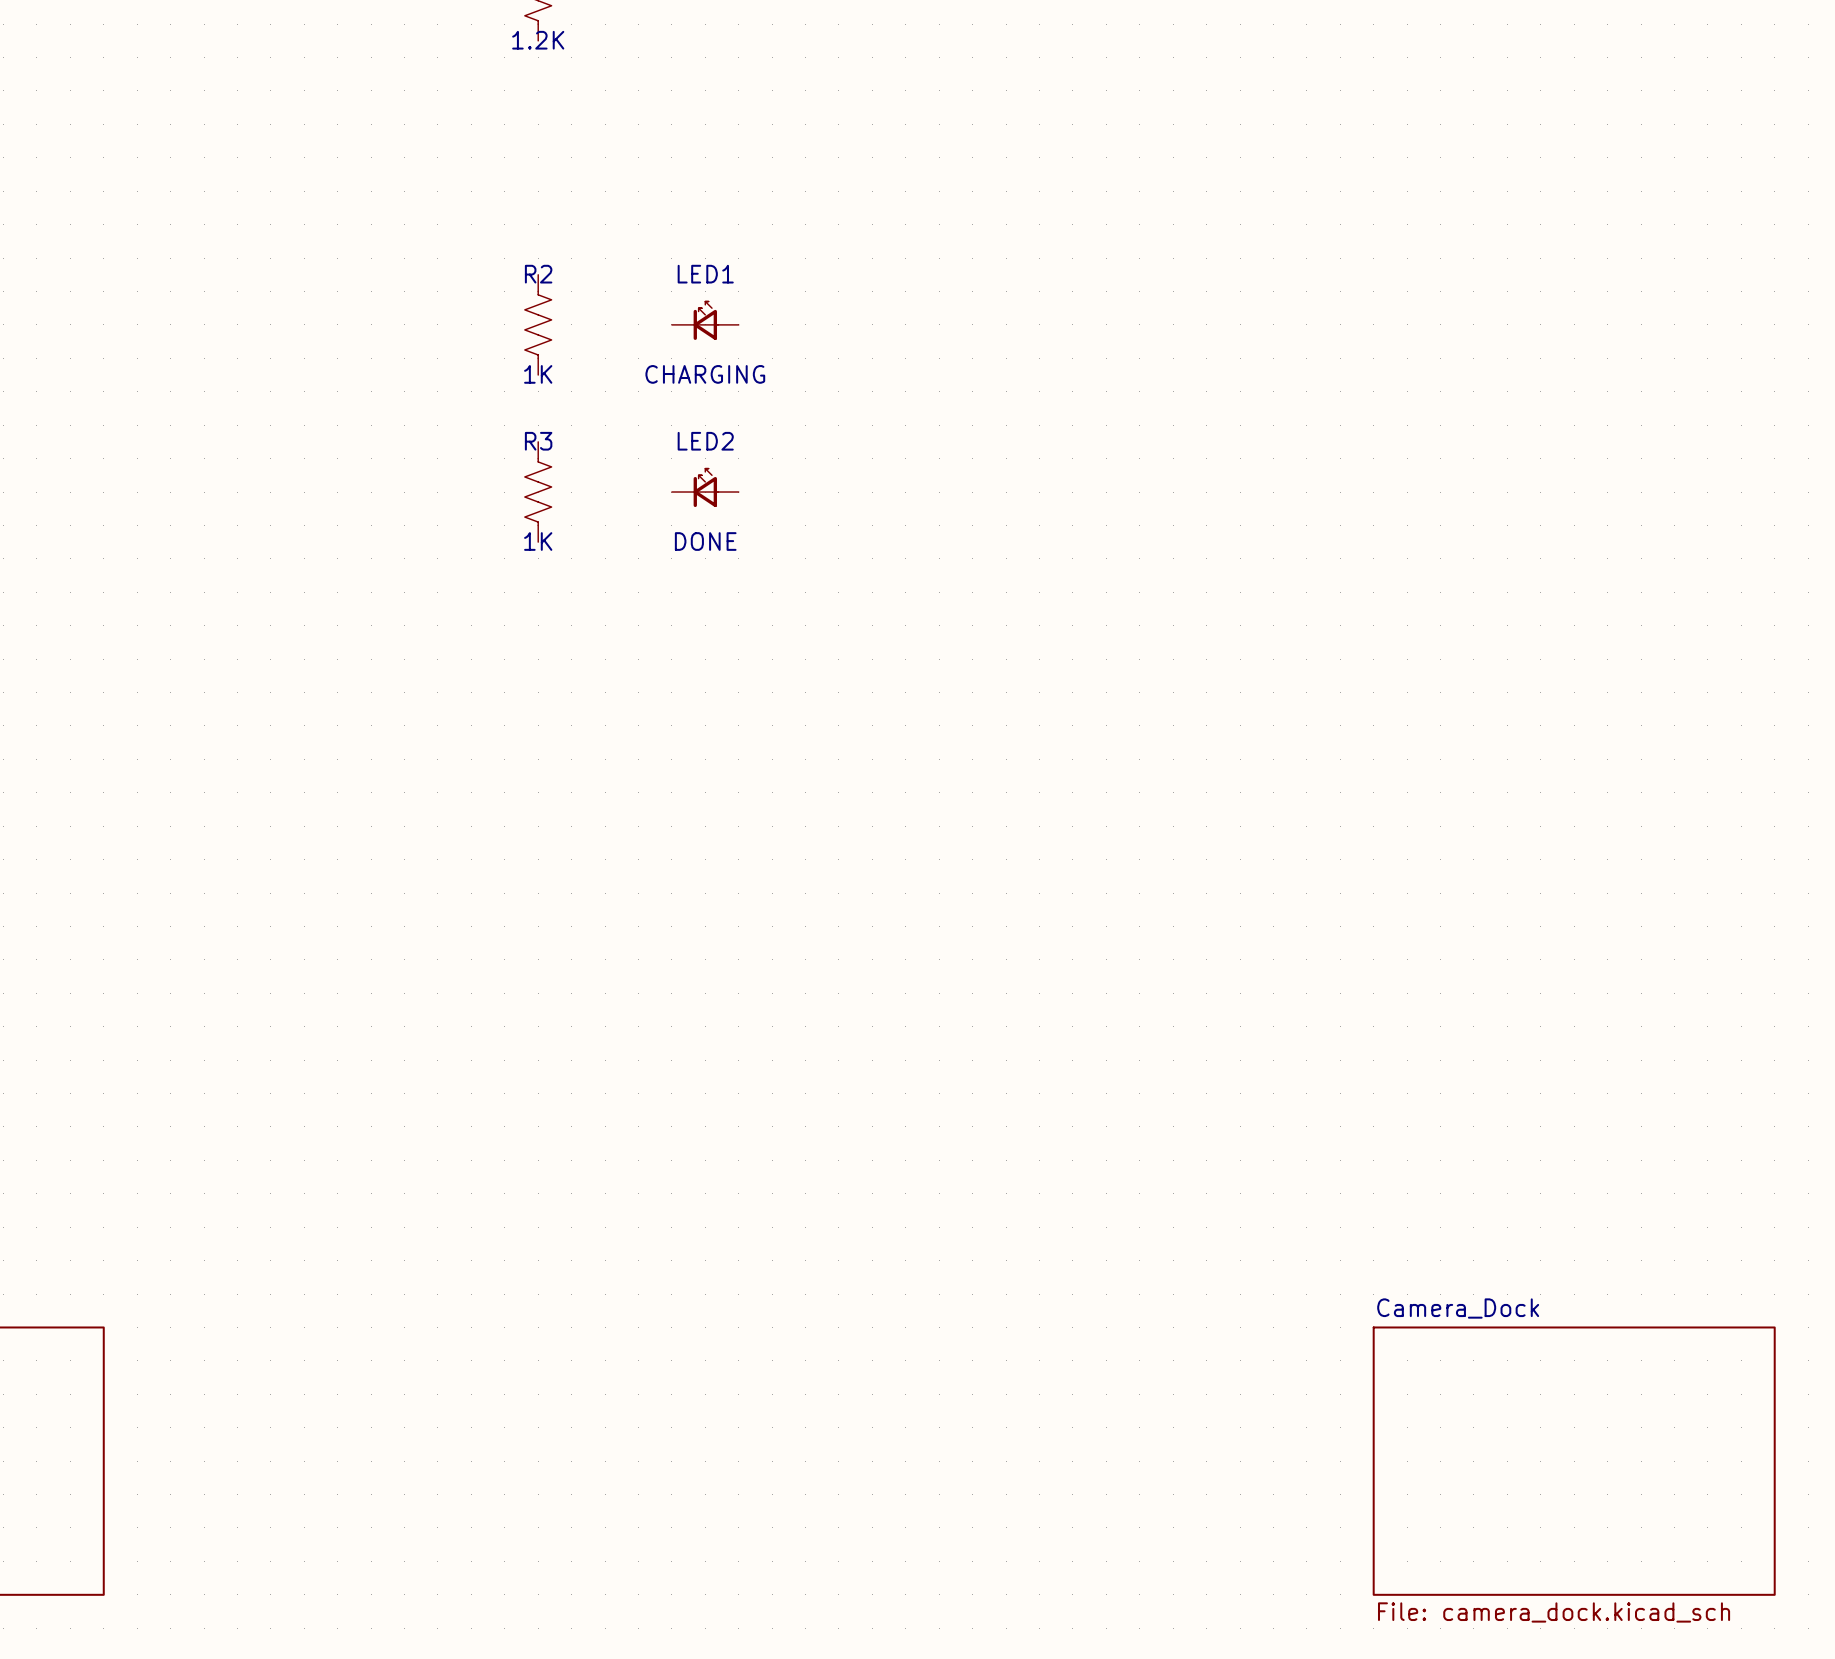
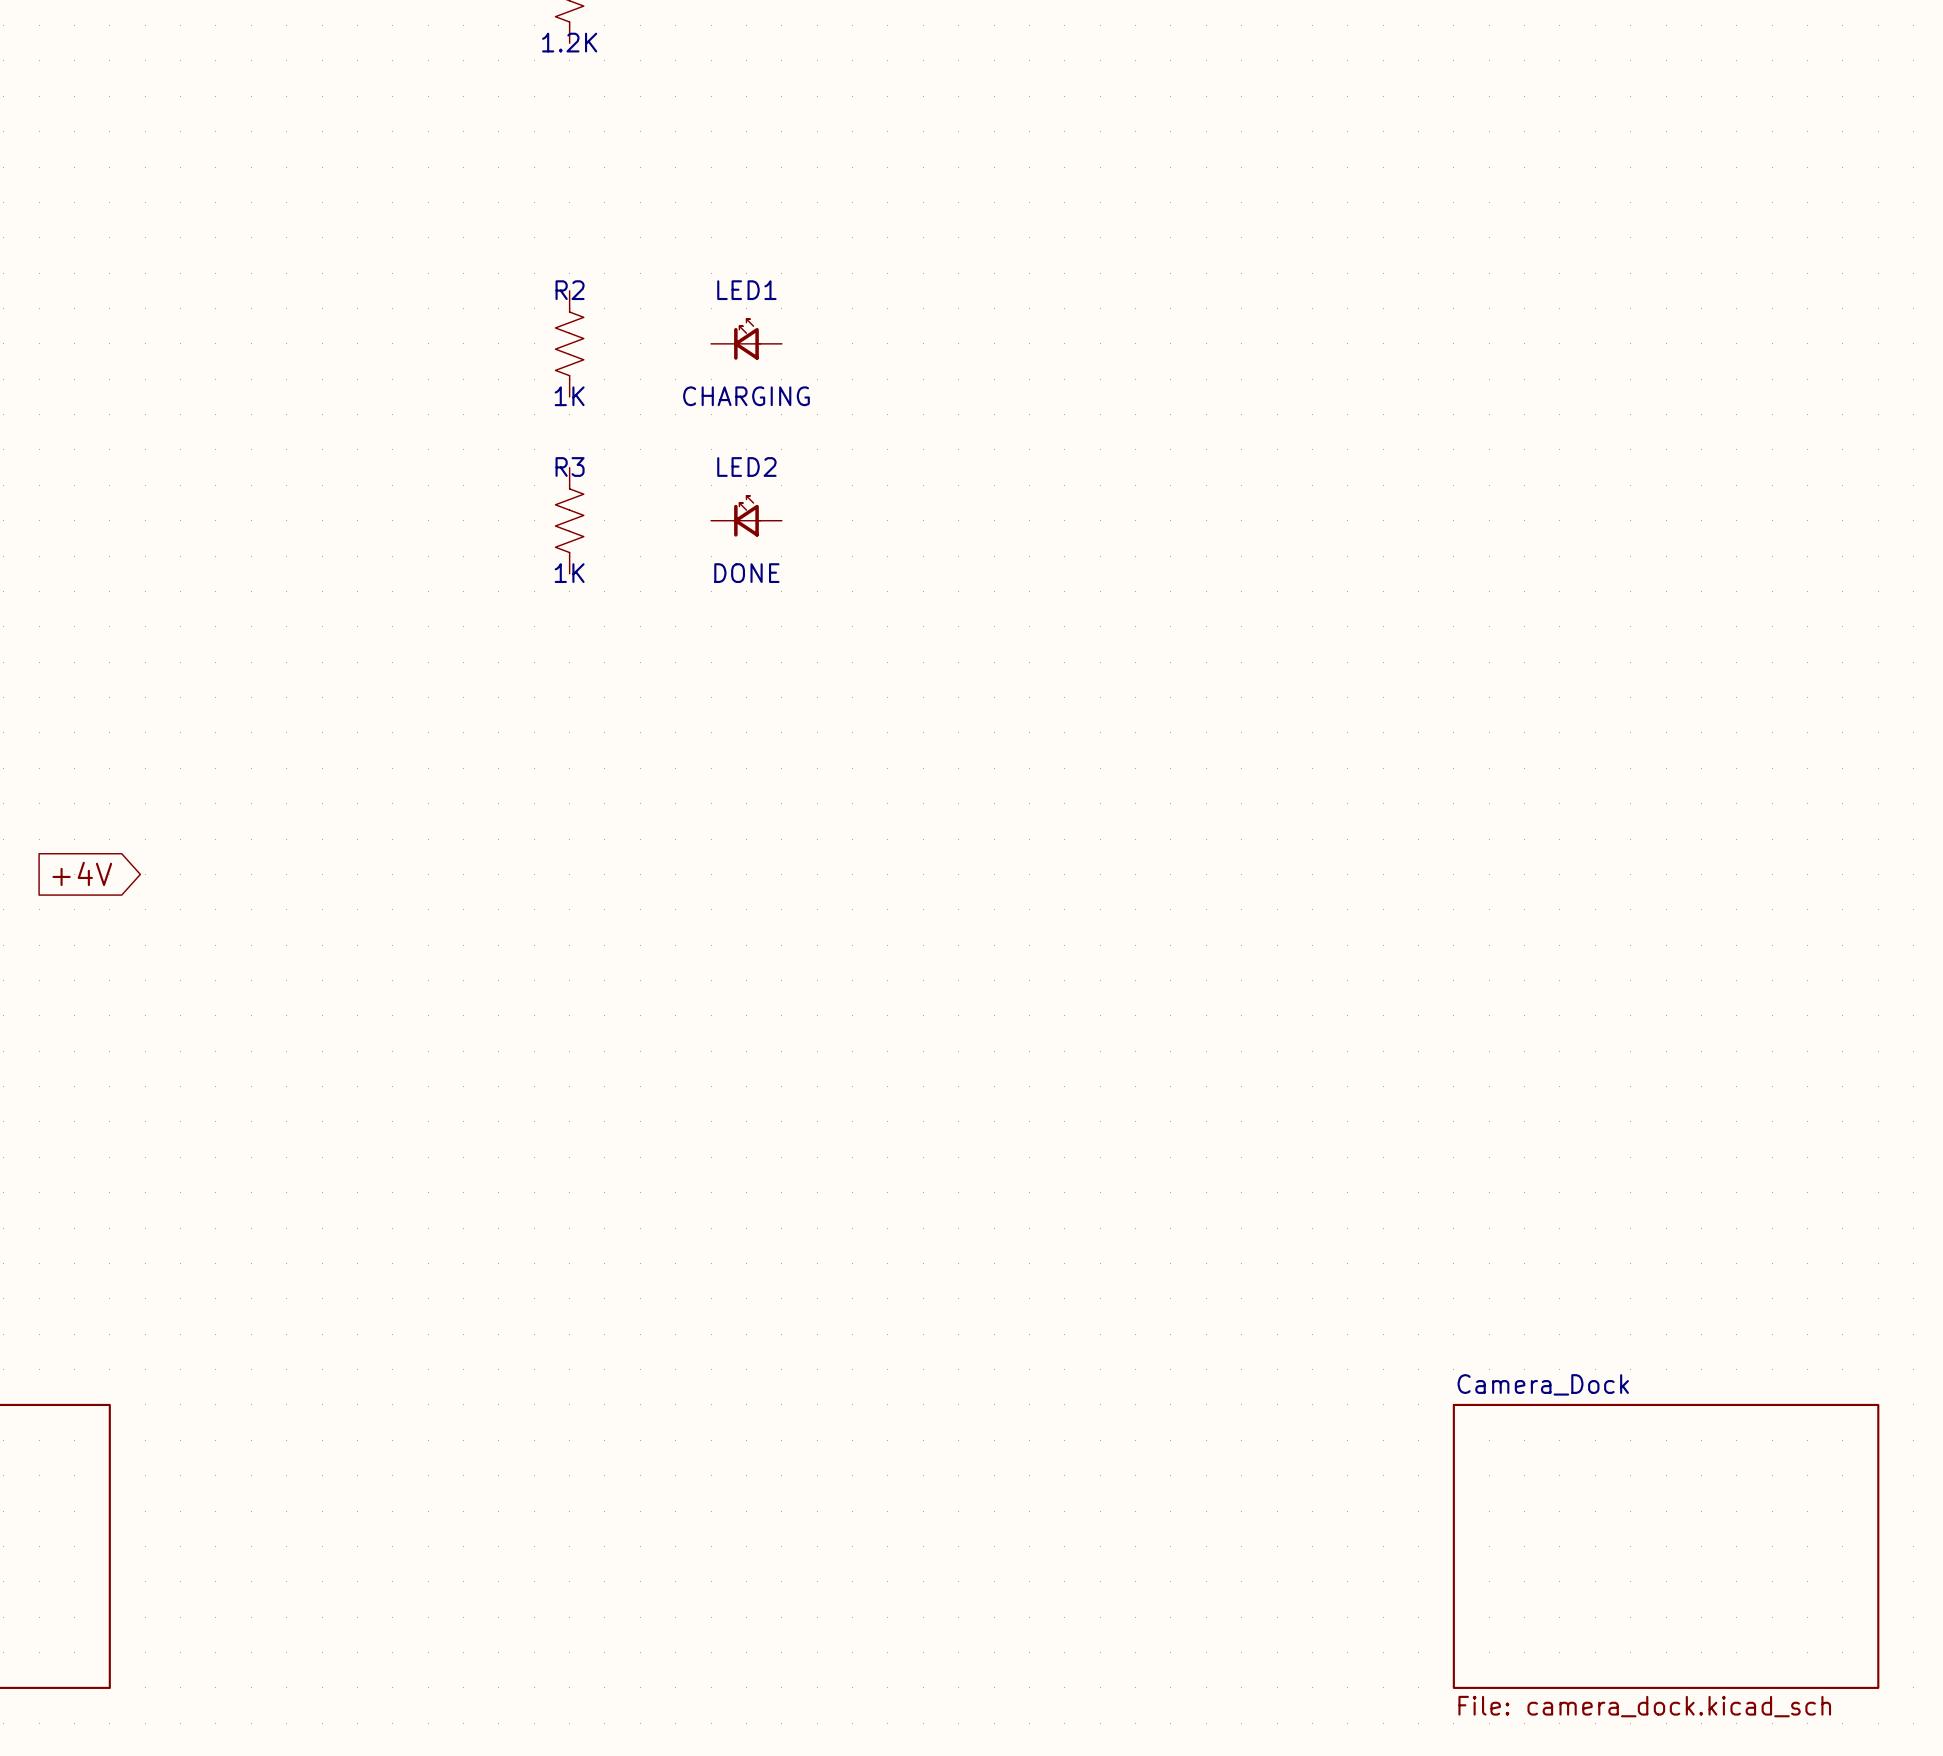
global label: none -> +4V (82, 873)

